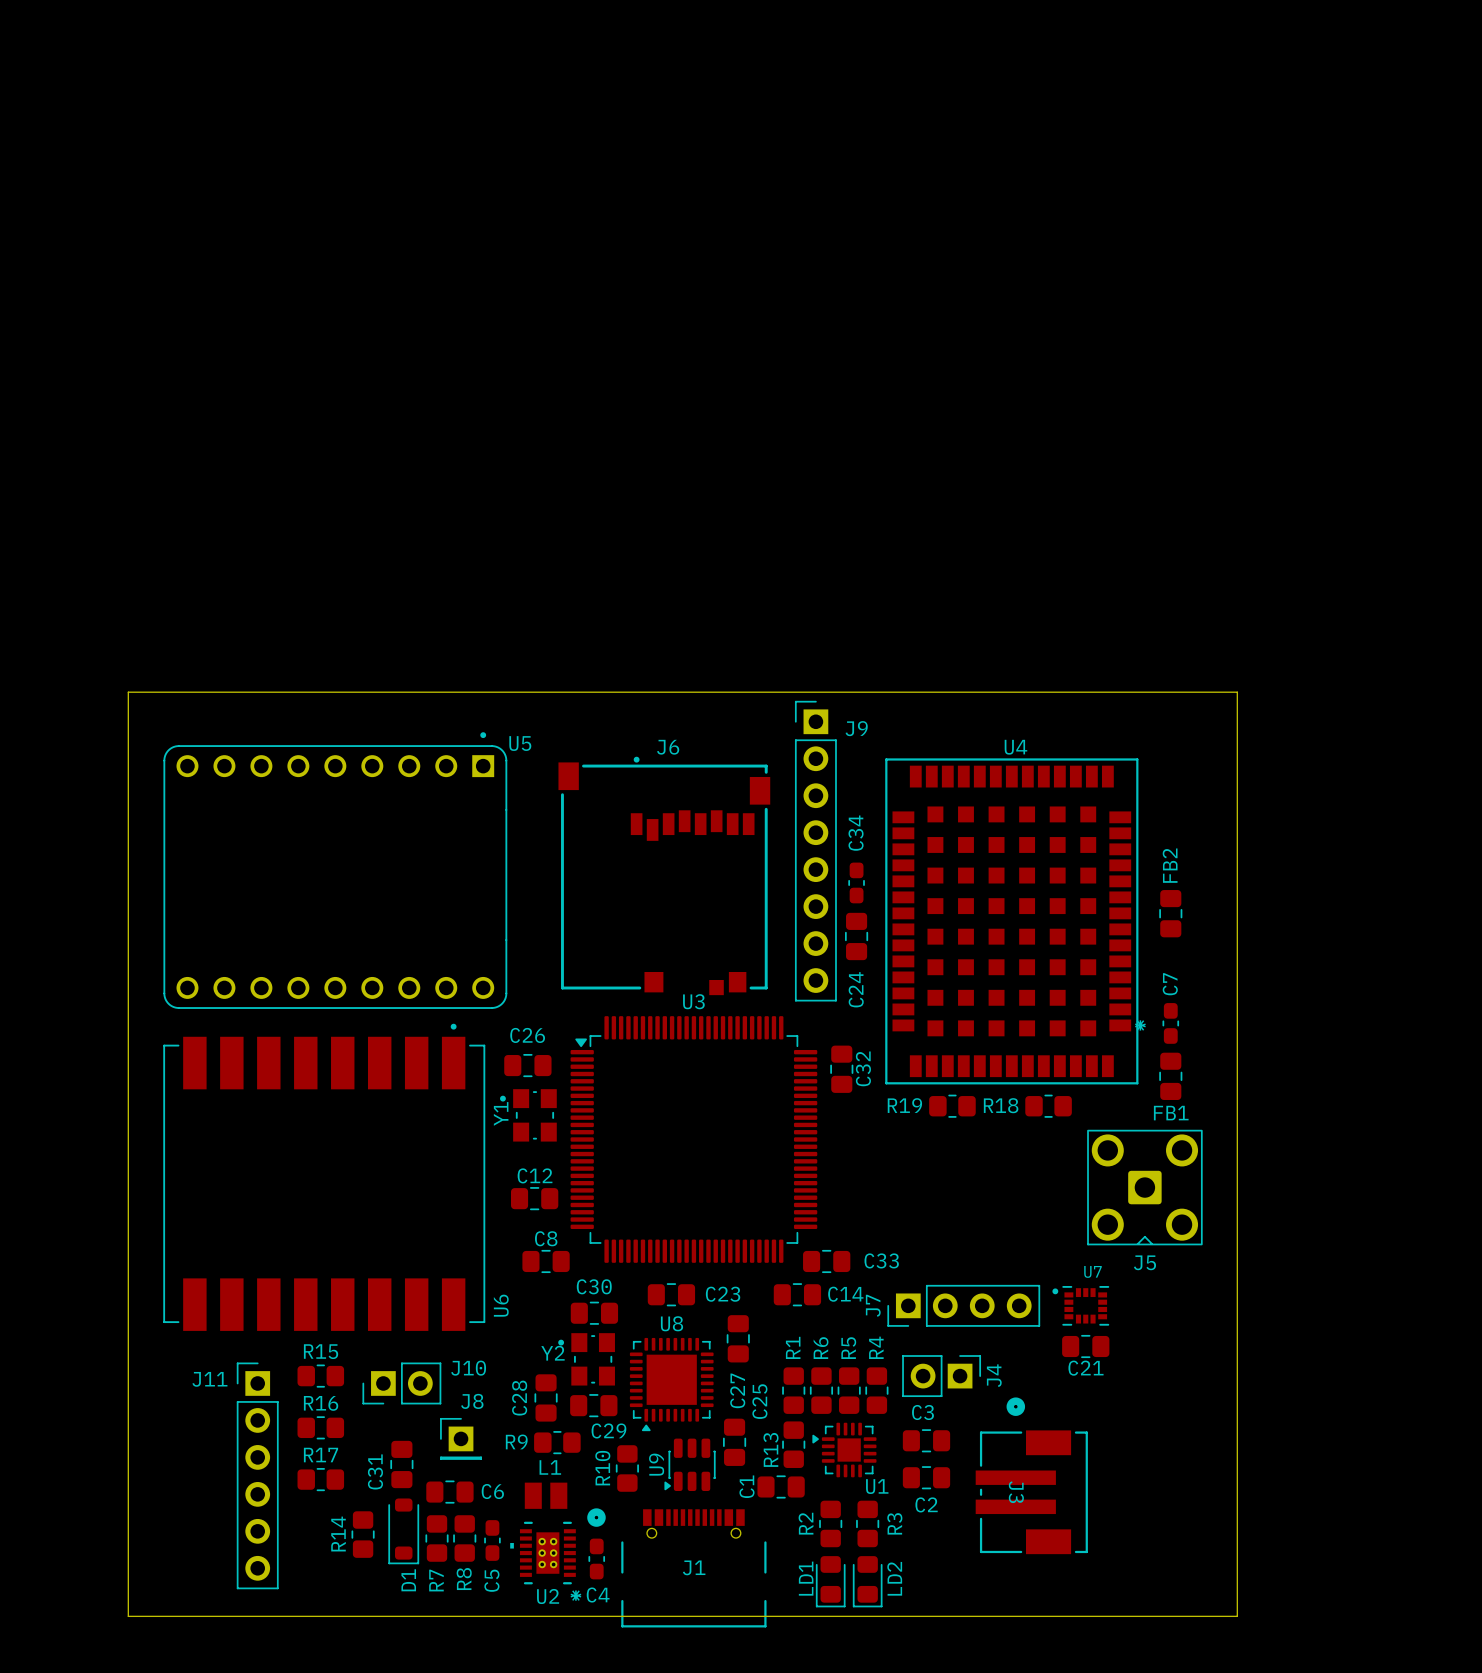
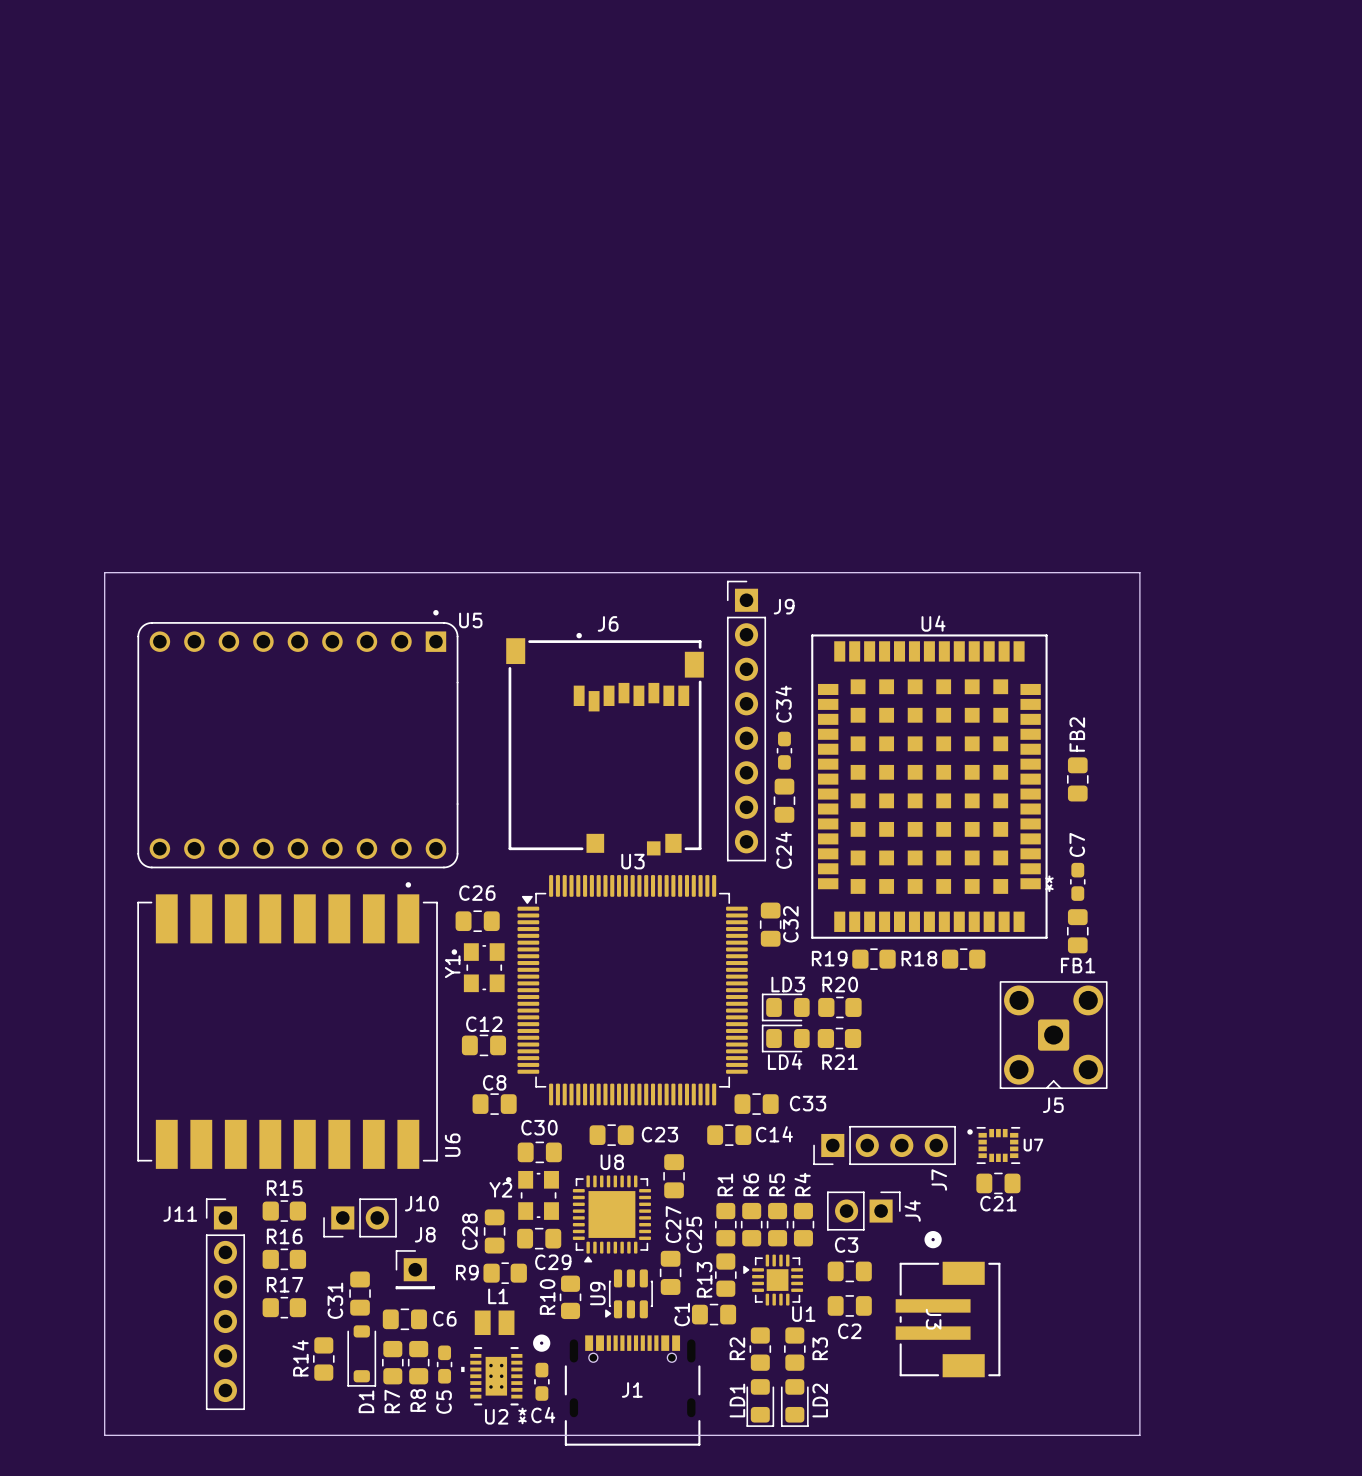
LD3: none -> (785, 1007)
R20: none -> (839, 1007)
LD4: none -> (785, 1038)
R21: none -> (839, 1038)
U7 name position: U7 (1092, 1271) -> U7 (1033, 1145)
J7 name position: J7 (873, 1305) -> J7 (939, 1179)

